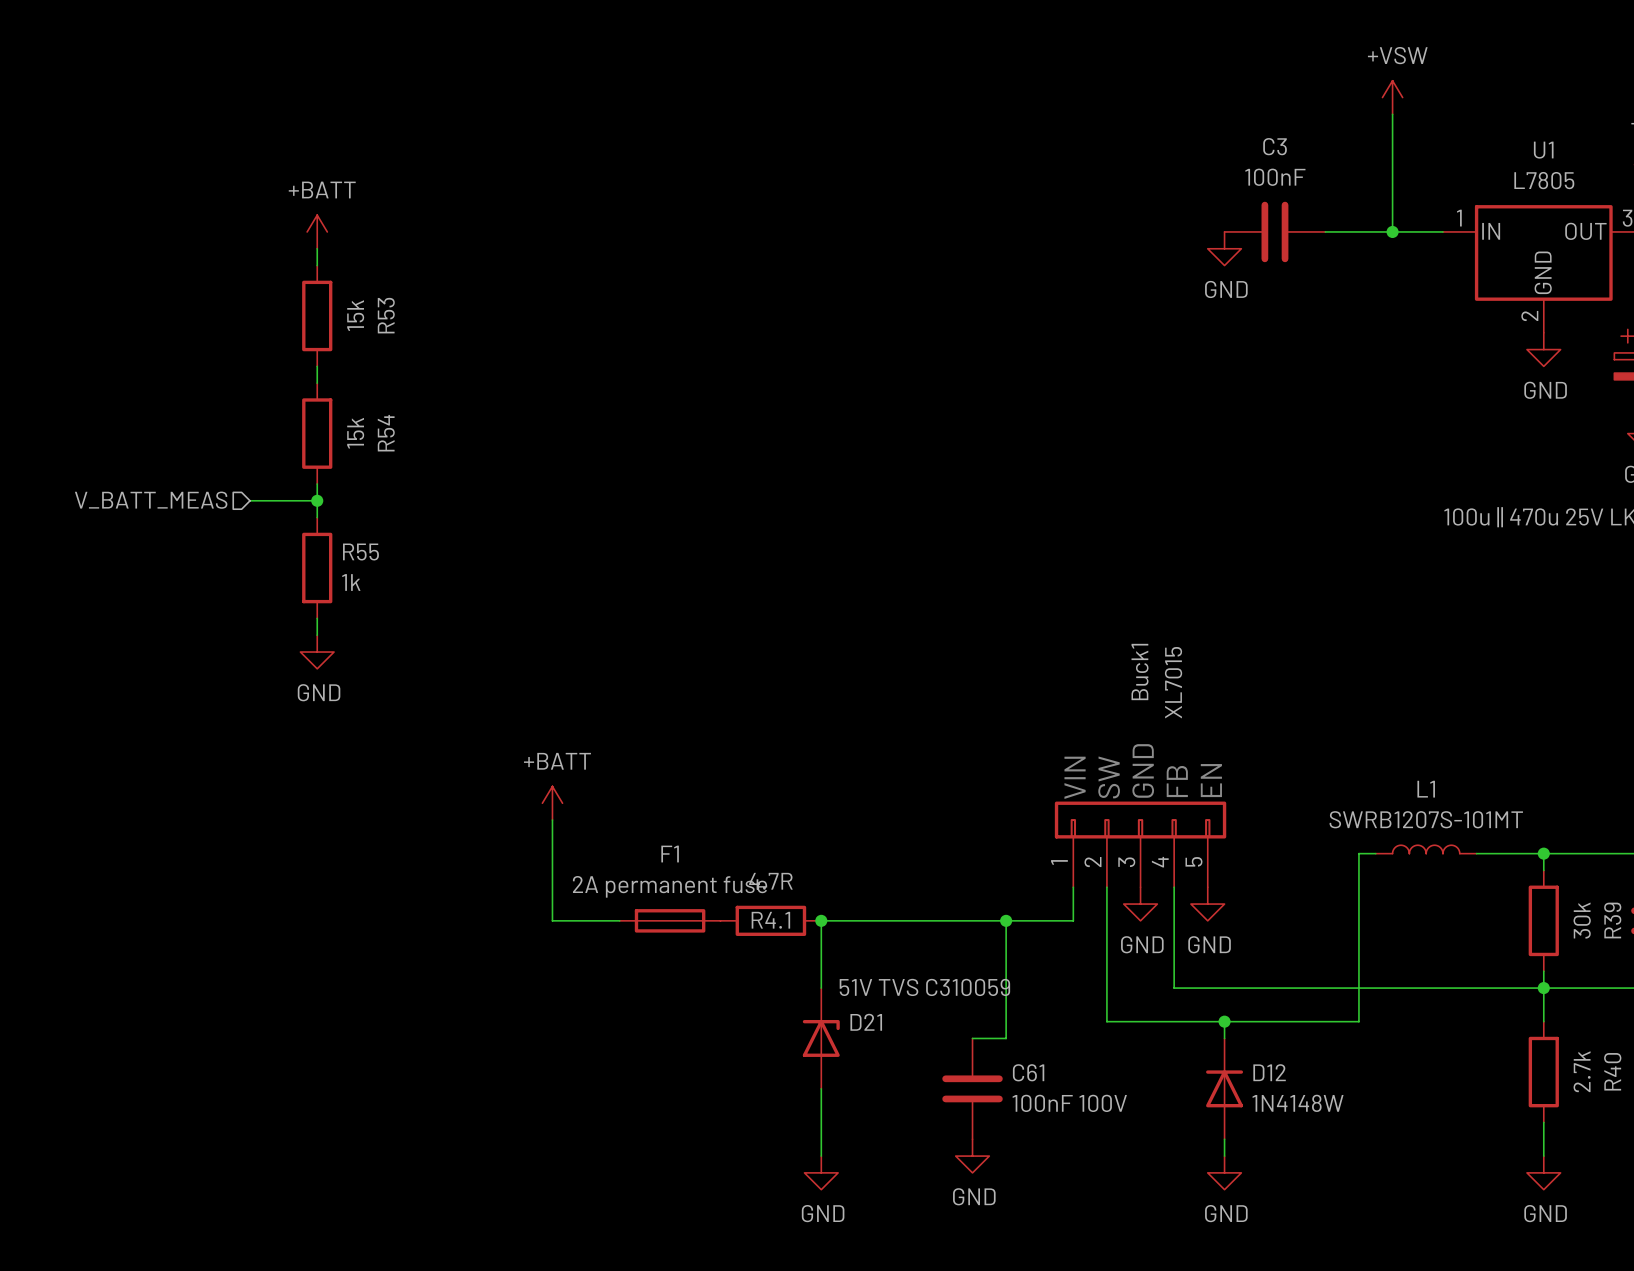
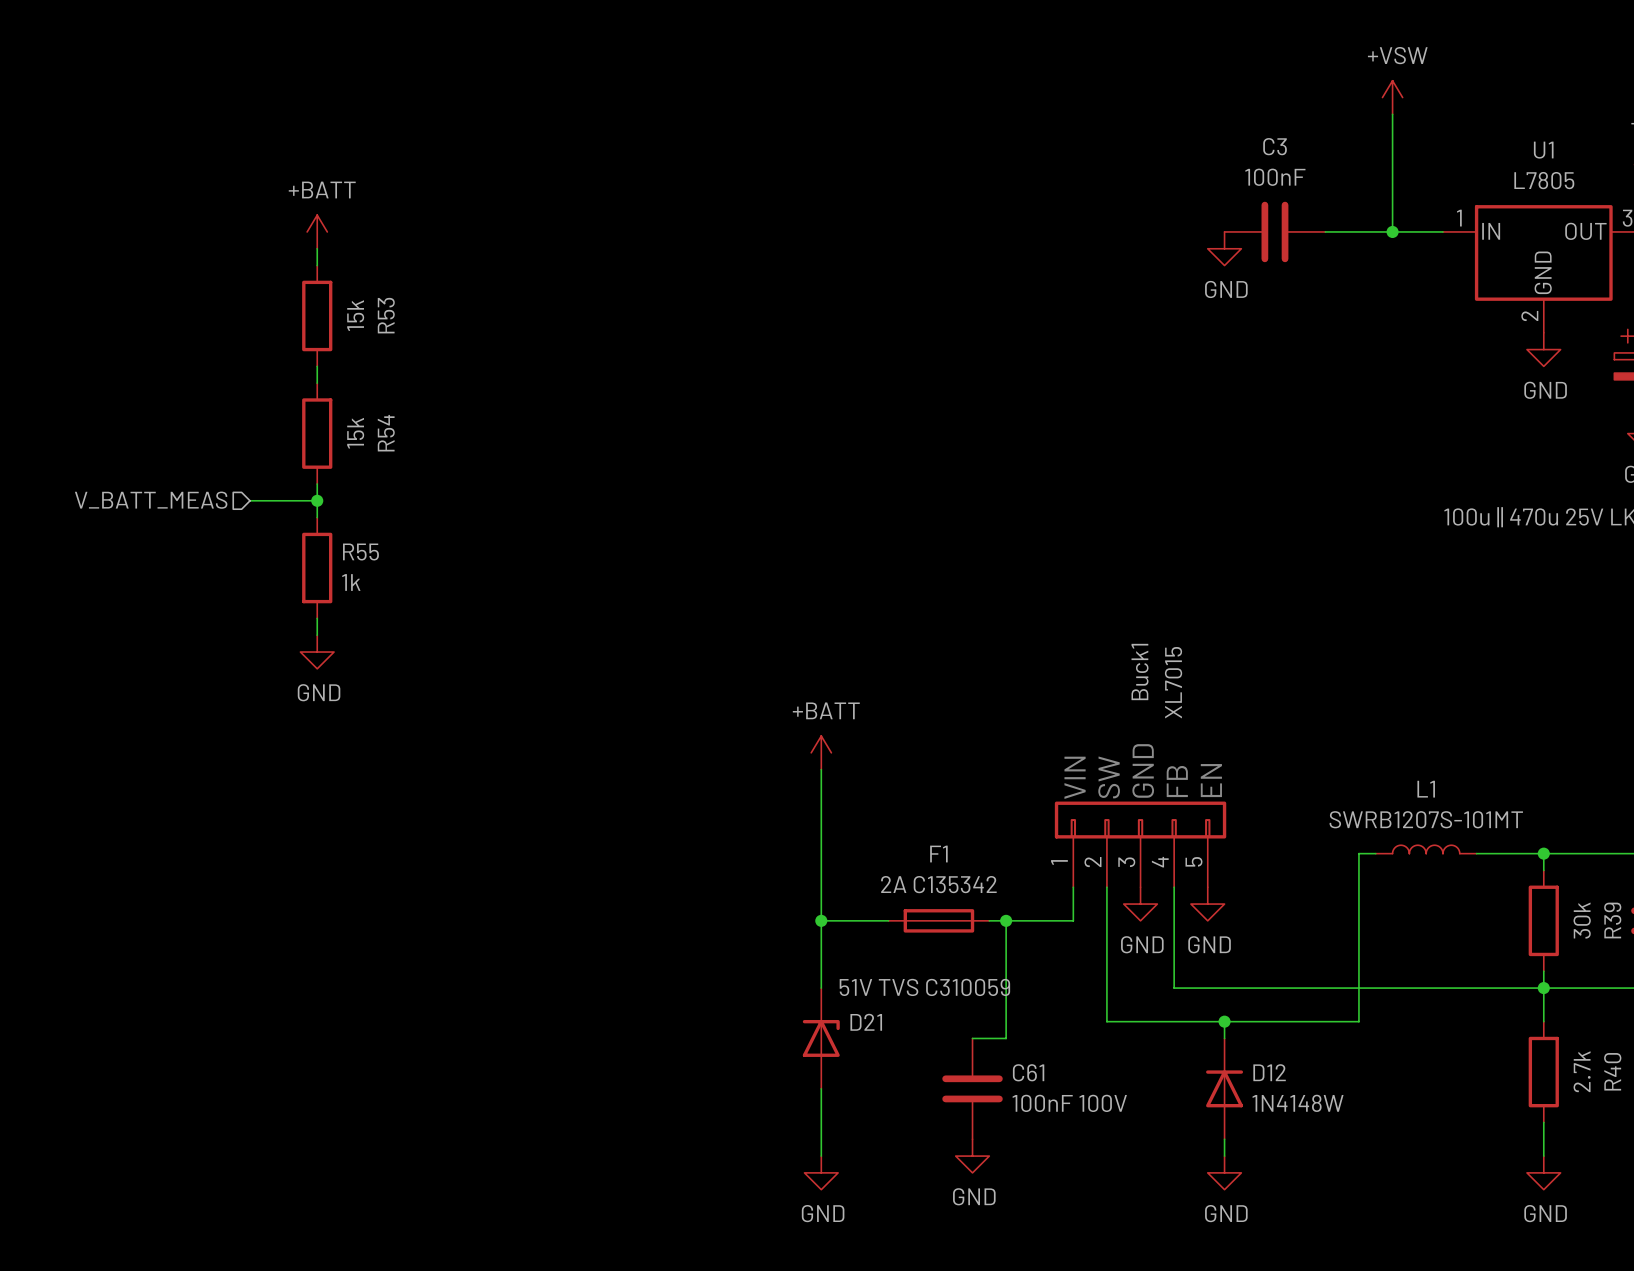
wire: none -> (821, 769) (821, 920)
power symbol position: +BATT (552, 803) -> +BATT (821, 752)
wire: (552, 820) (552, 920) (619, 920) -> none
F1 value: 2A permanent fuse (670, 886) -> 2A C135342 (938, 884)
F1 position: (670, 920) -> (938, 920)
R4.1: 4.7R (770, 920) -> none

